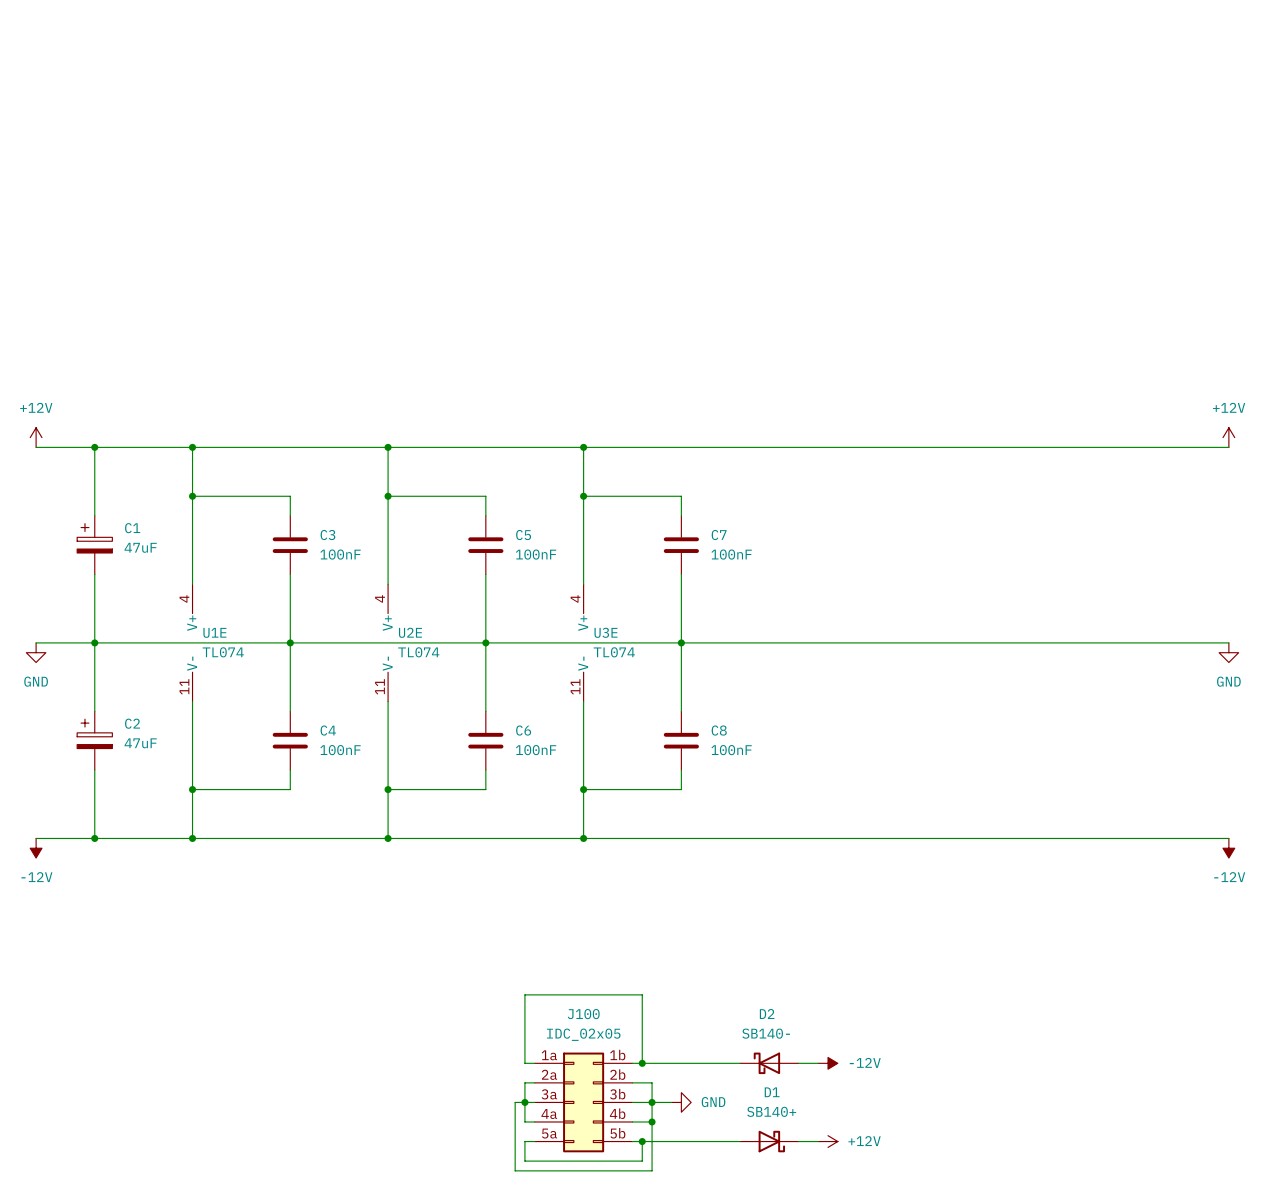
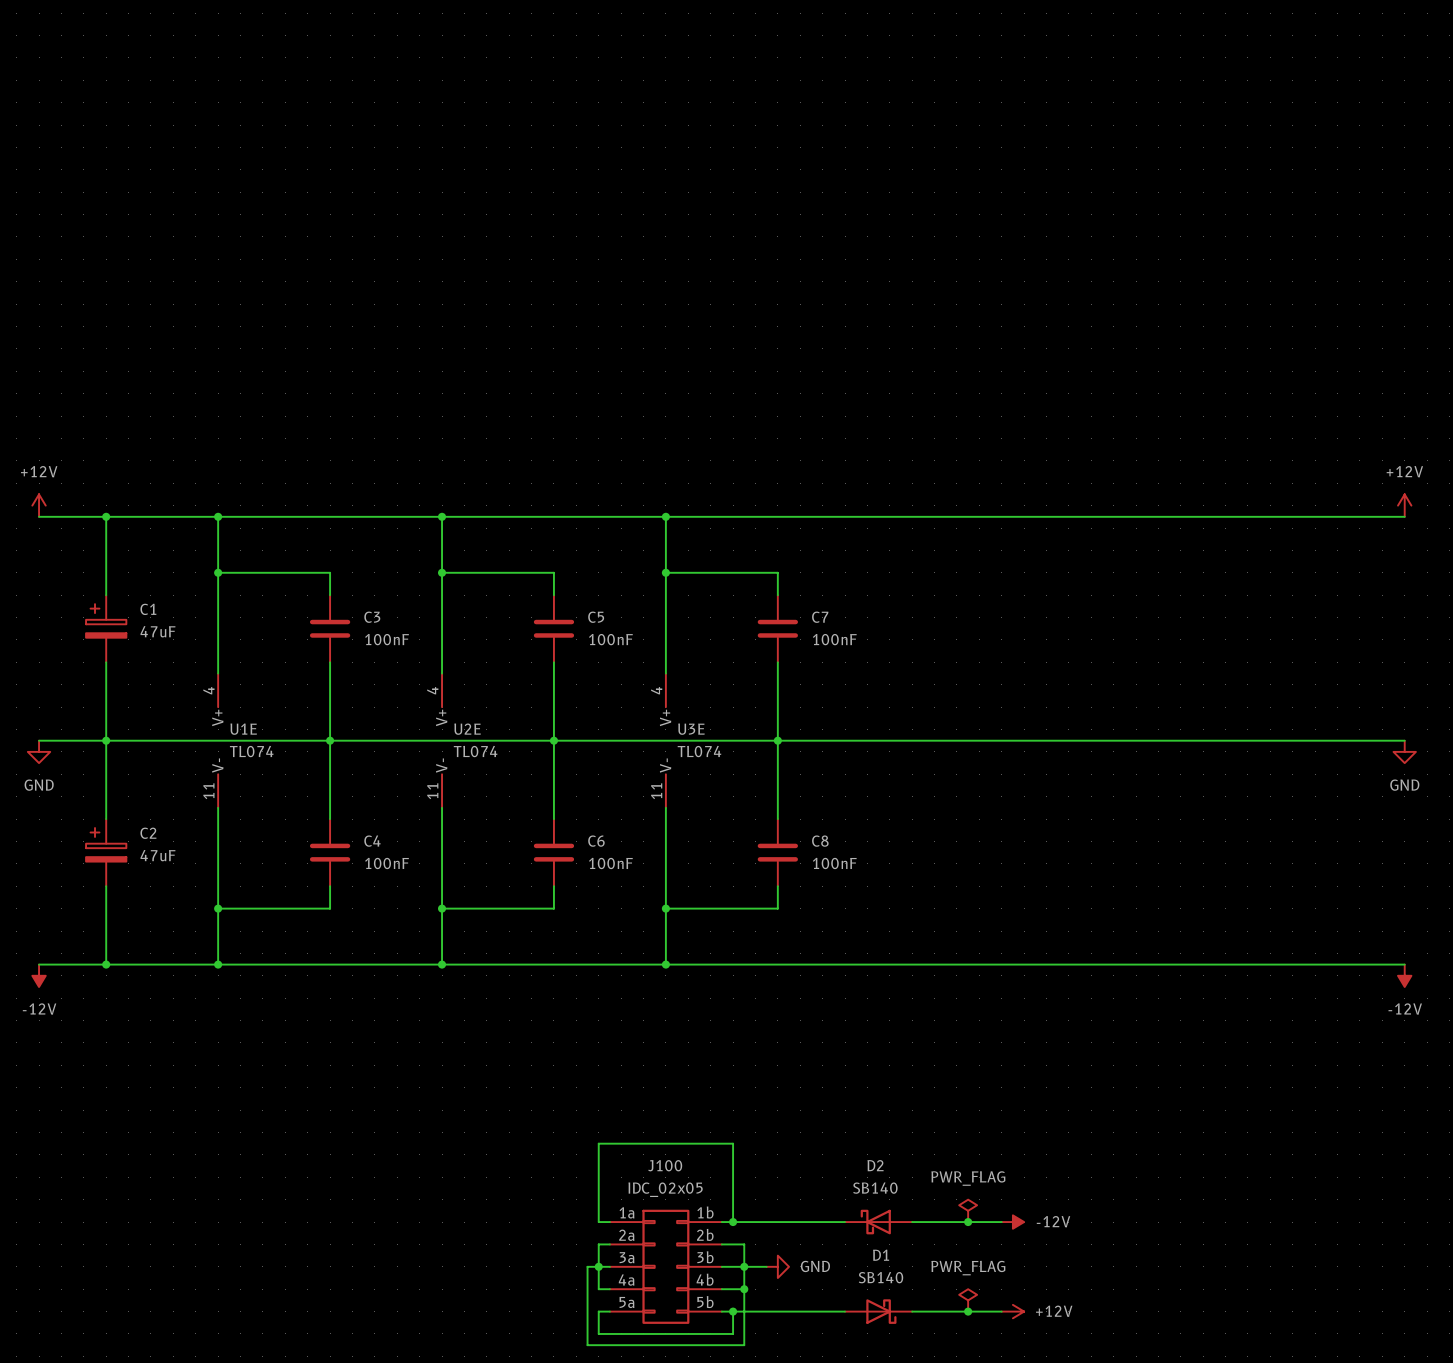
D2 value: SB140- (766, 1033) -> SB140 (875, 1188)
power symbol: none -> PWR_FLAG (968, 1210)
wire: none -> (934, 1222) (1001, 1222)
power symbol position: -12V (828, 1063) -> -12V (1012, 1222)
junction: none -> (968, 1222)
D1 value: SB140+ (771, 1111) -> SB140 (880, 1277)
power symbol: none -> PWR_FLAG (968, 1300)
wire: none -> (934, 1311) (1001, 1311)
power symbol position: +12V (828, 1141) -> +12V (1012, 1311)
junction: none -> (968, 1311)

